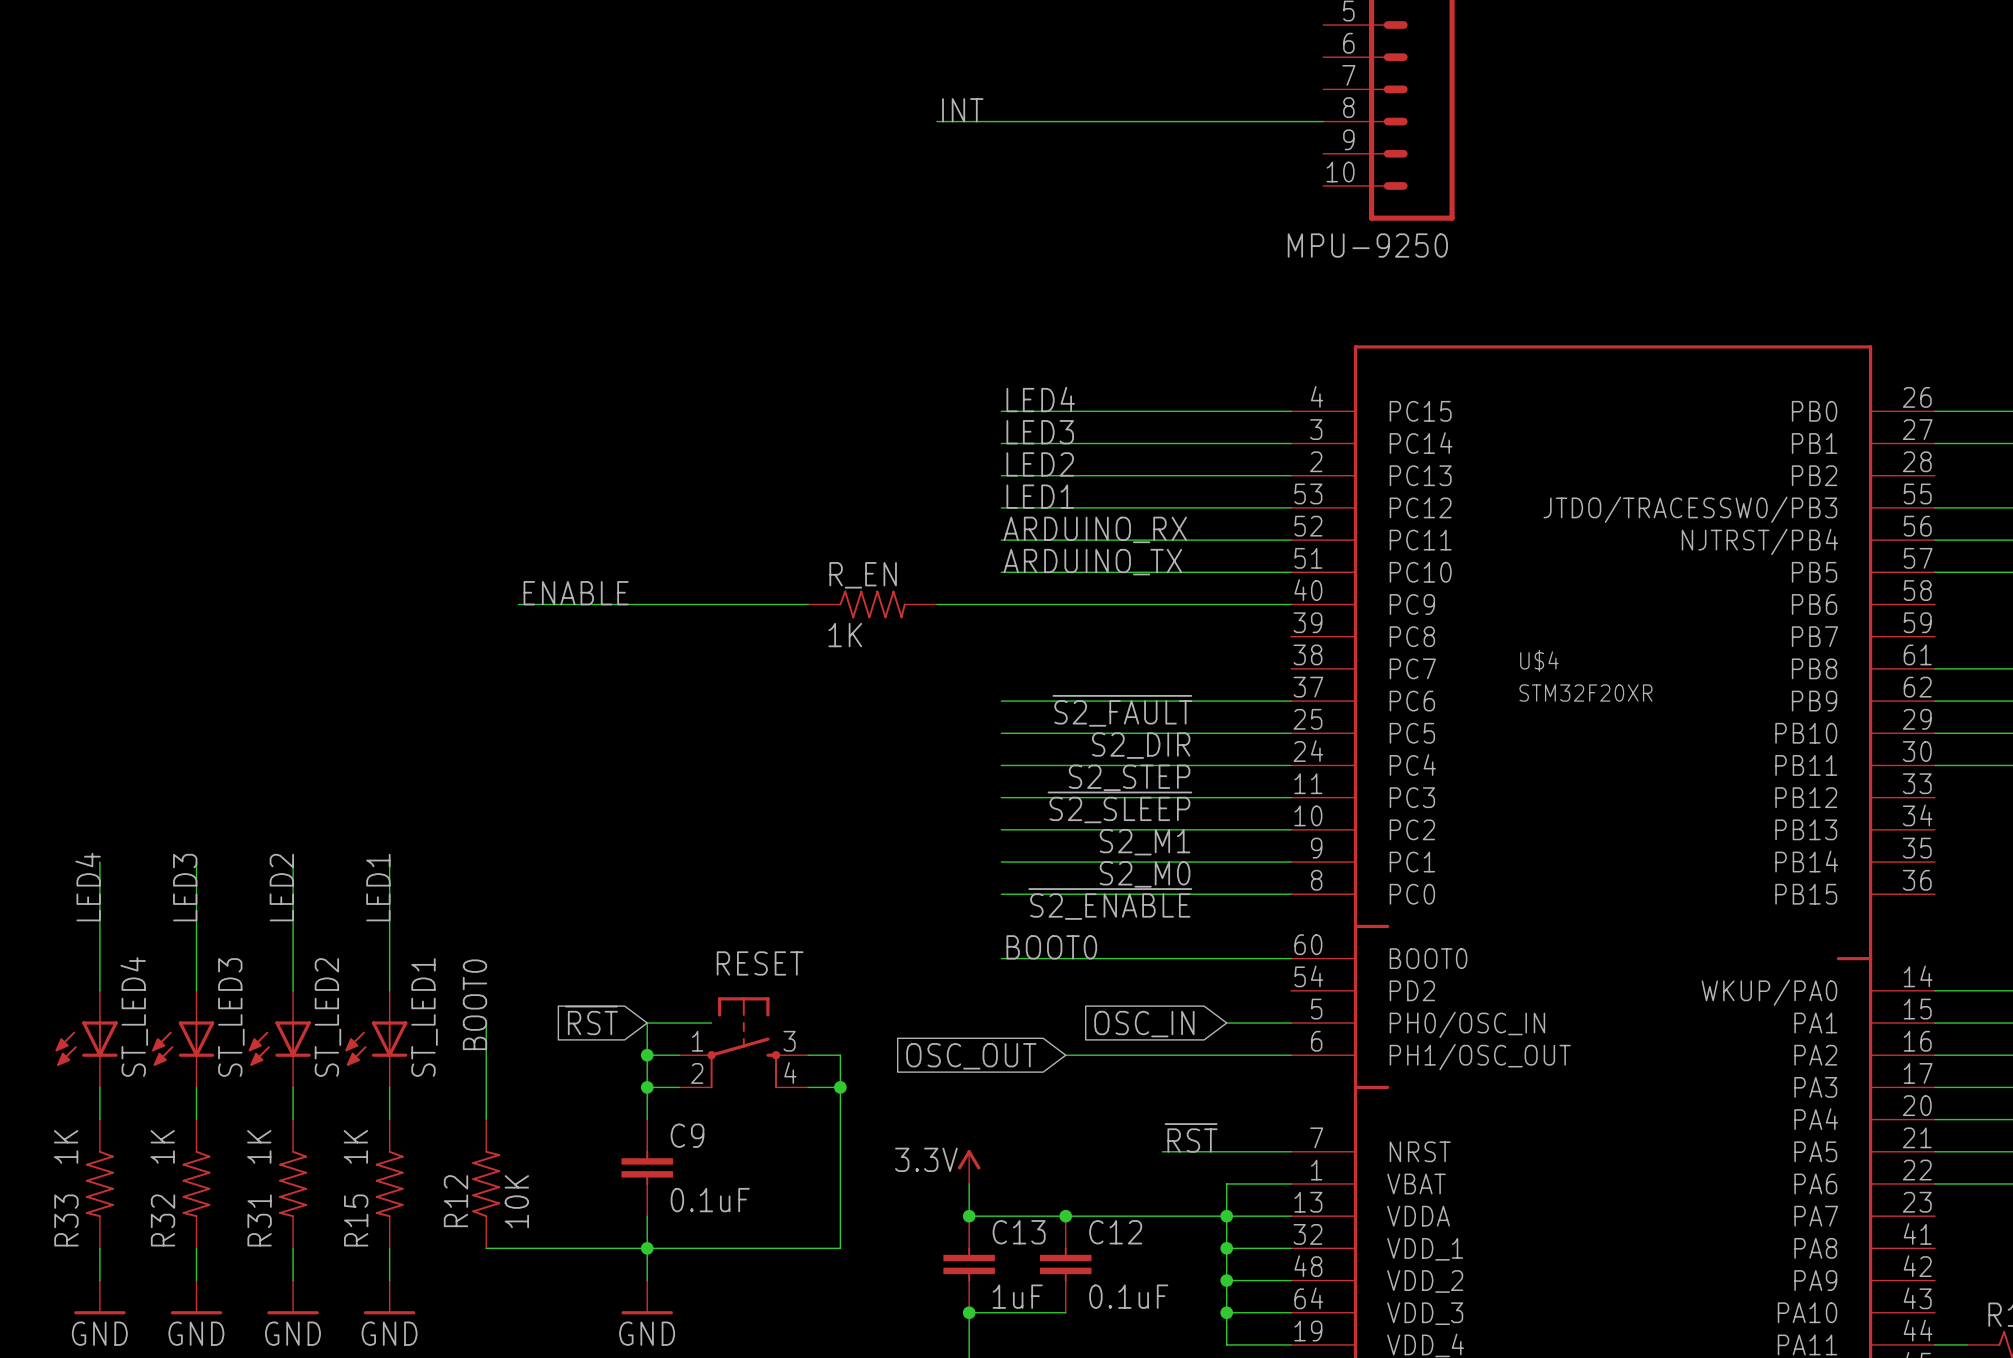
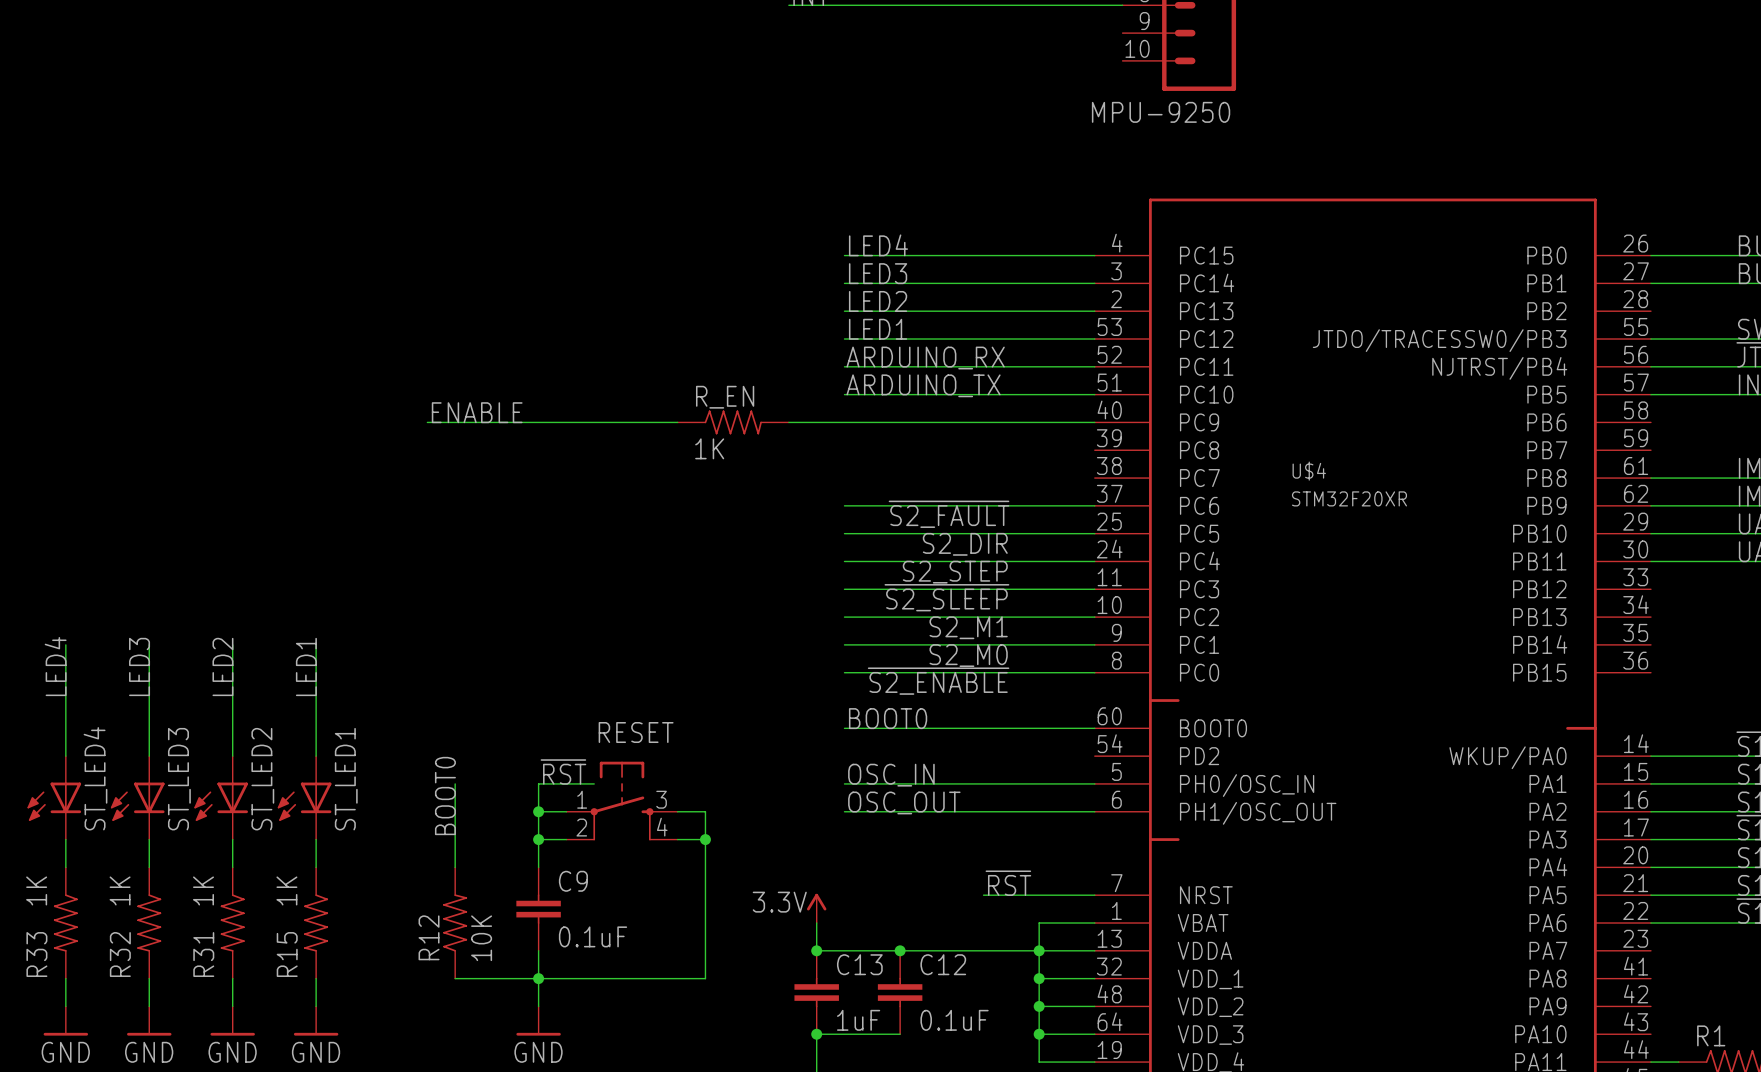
label position: BOOT0 (474, 1004) -> BOOT0 (445, 796)
label: none -> ~{RST} (563, 771)
label: none -> OSC_IN (891, 775)
global label: ~{RST} (591, 1020) -> none
wire: (486, 1023) (486, 1119) -> (455, 783) (455, 867)
wire: none -> (844, 783) (1039, 783)
global label: OSC_IN (1144, 1024) -> none
label: none -> OSC_OUT (904, 802)
wire: none -> (844, 811) (900, 811)
global label: OSC_OUT (971, 1056) -> none
R12 position: (486, 1183) -> (455, 923)
wire: (486, 1248) (550, 1248) -> none

